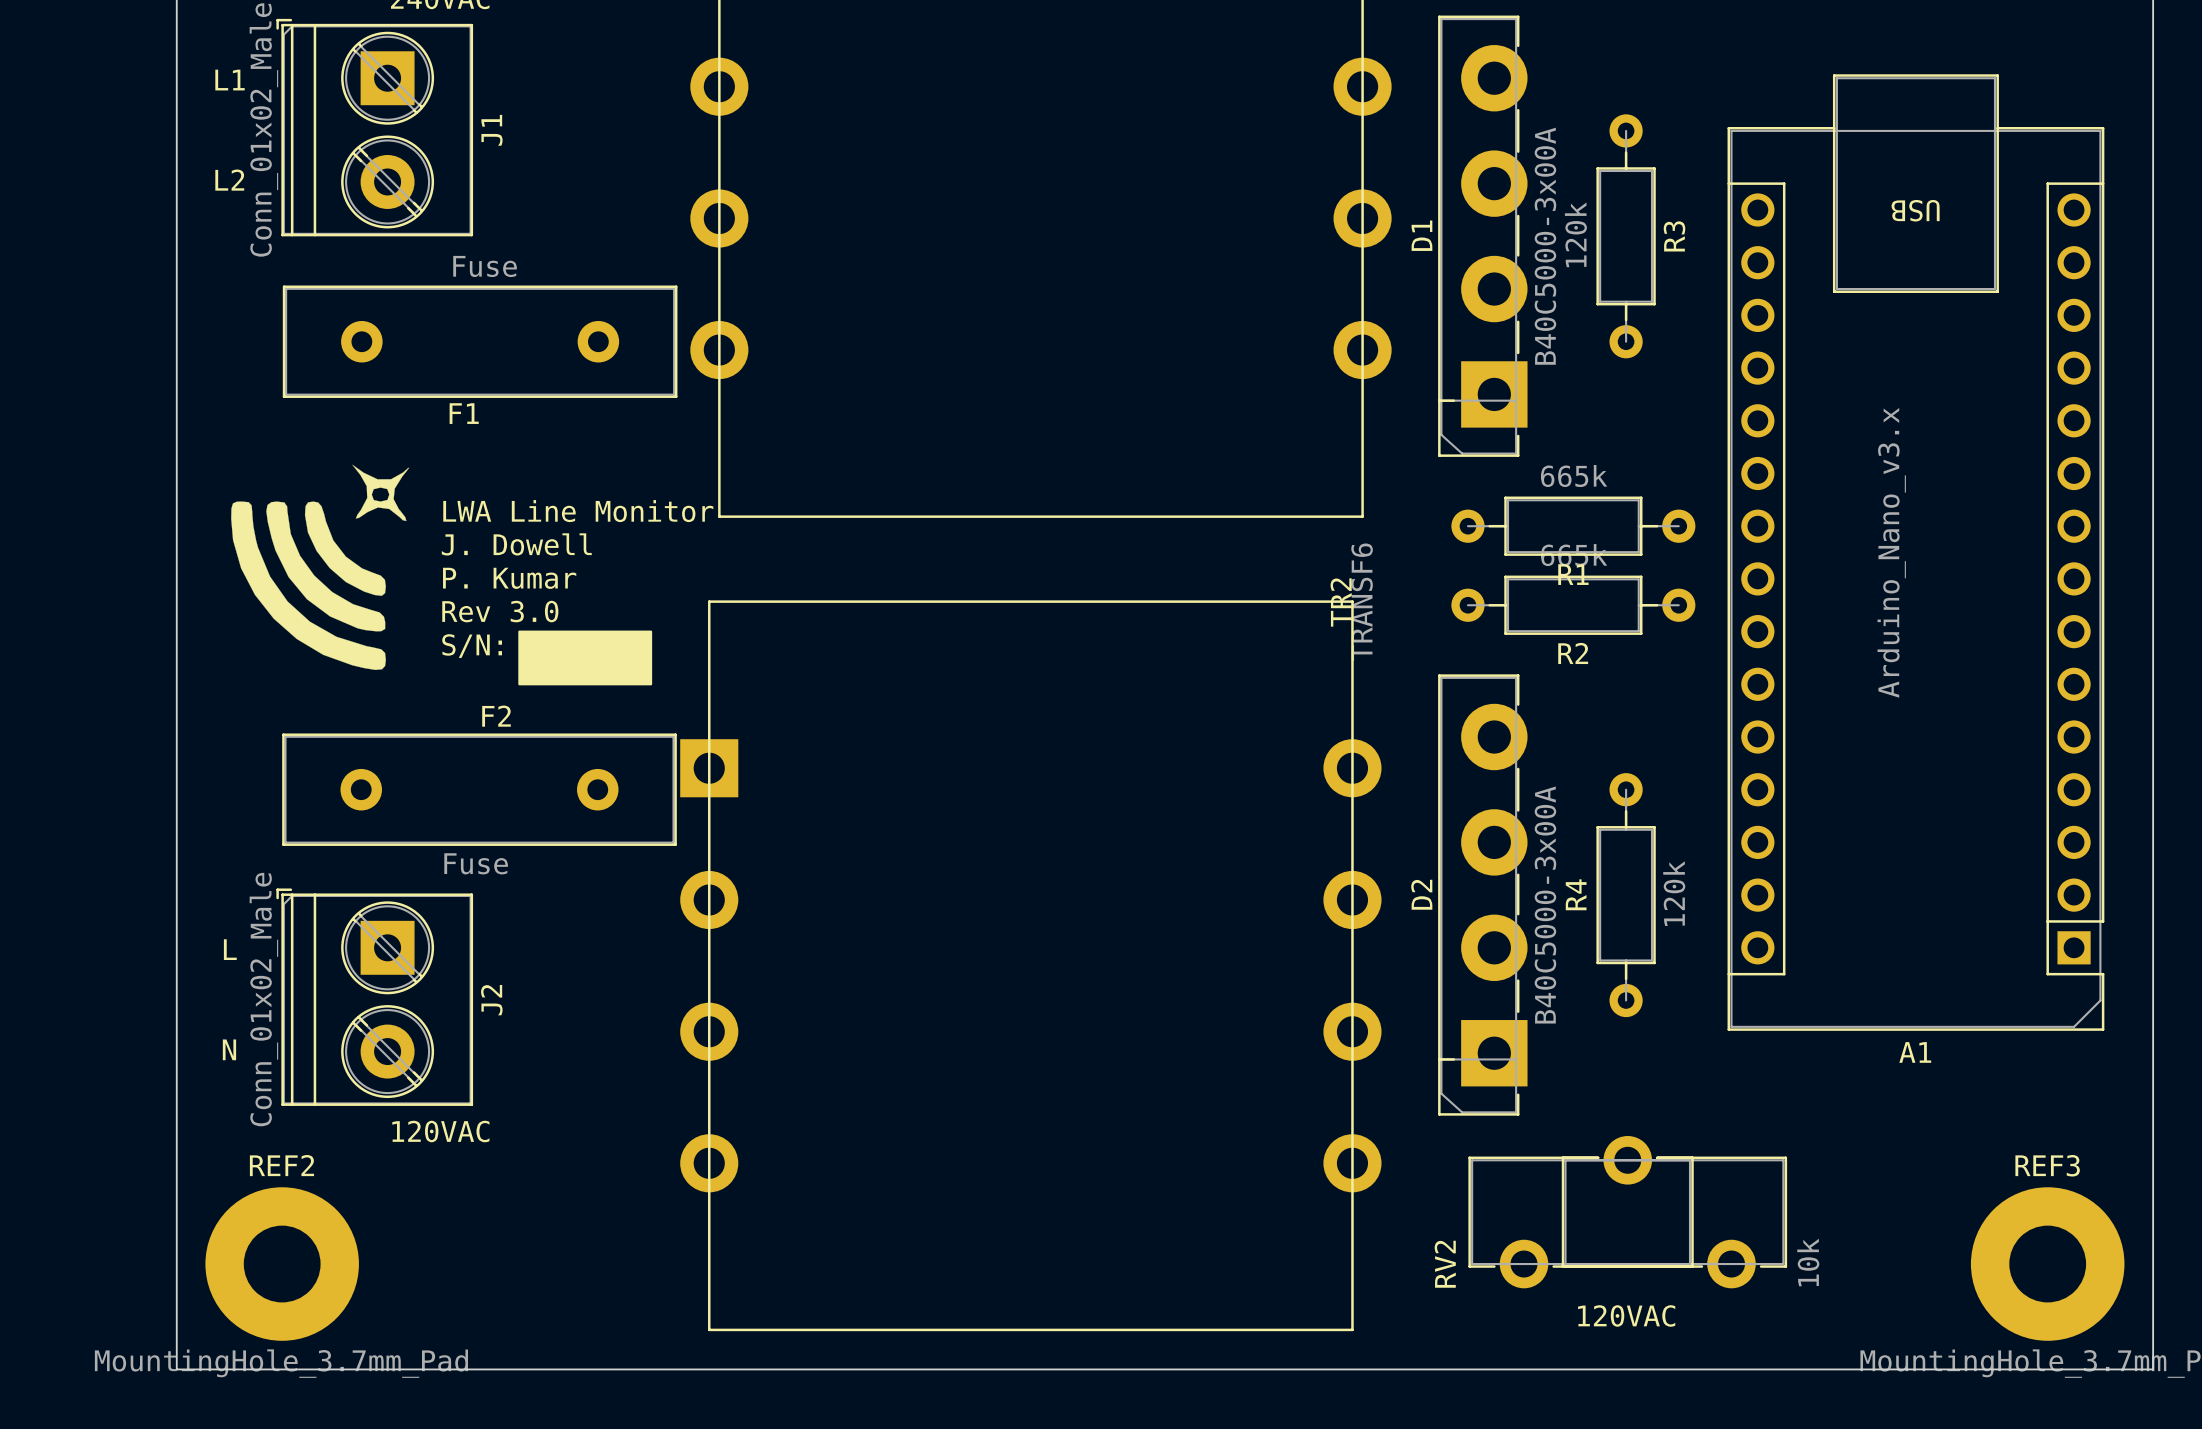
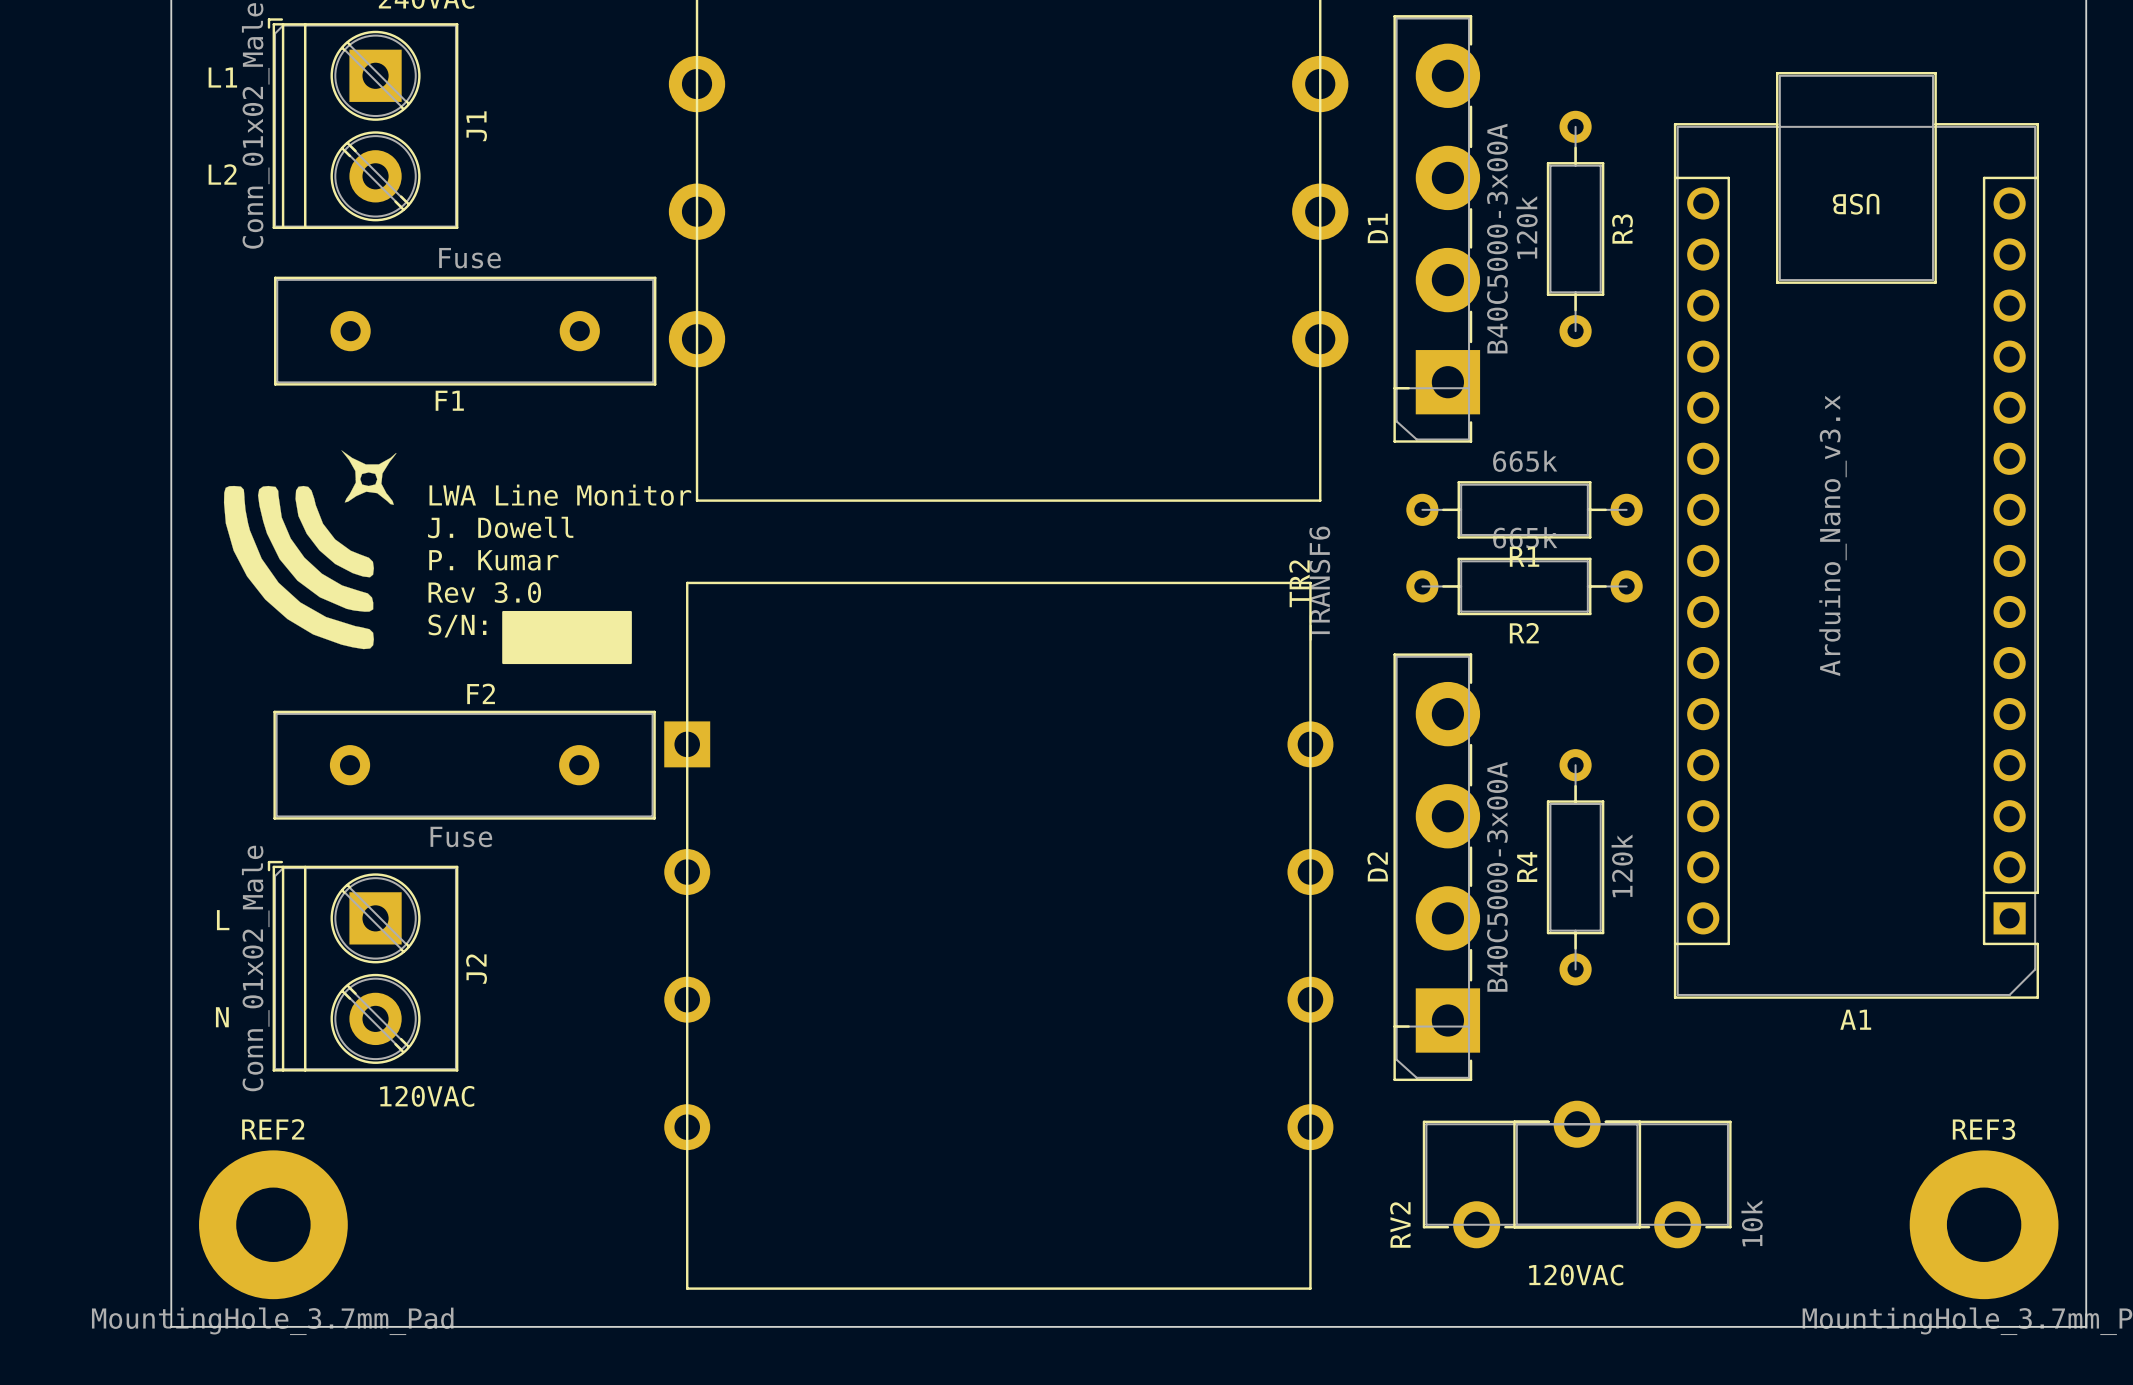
TR2 footprint: [680, 600, 1382, 1332] -> [664, 581, 1334, 1290]

